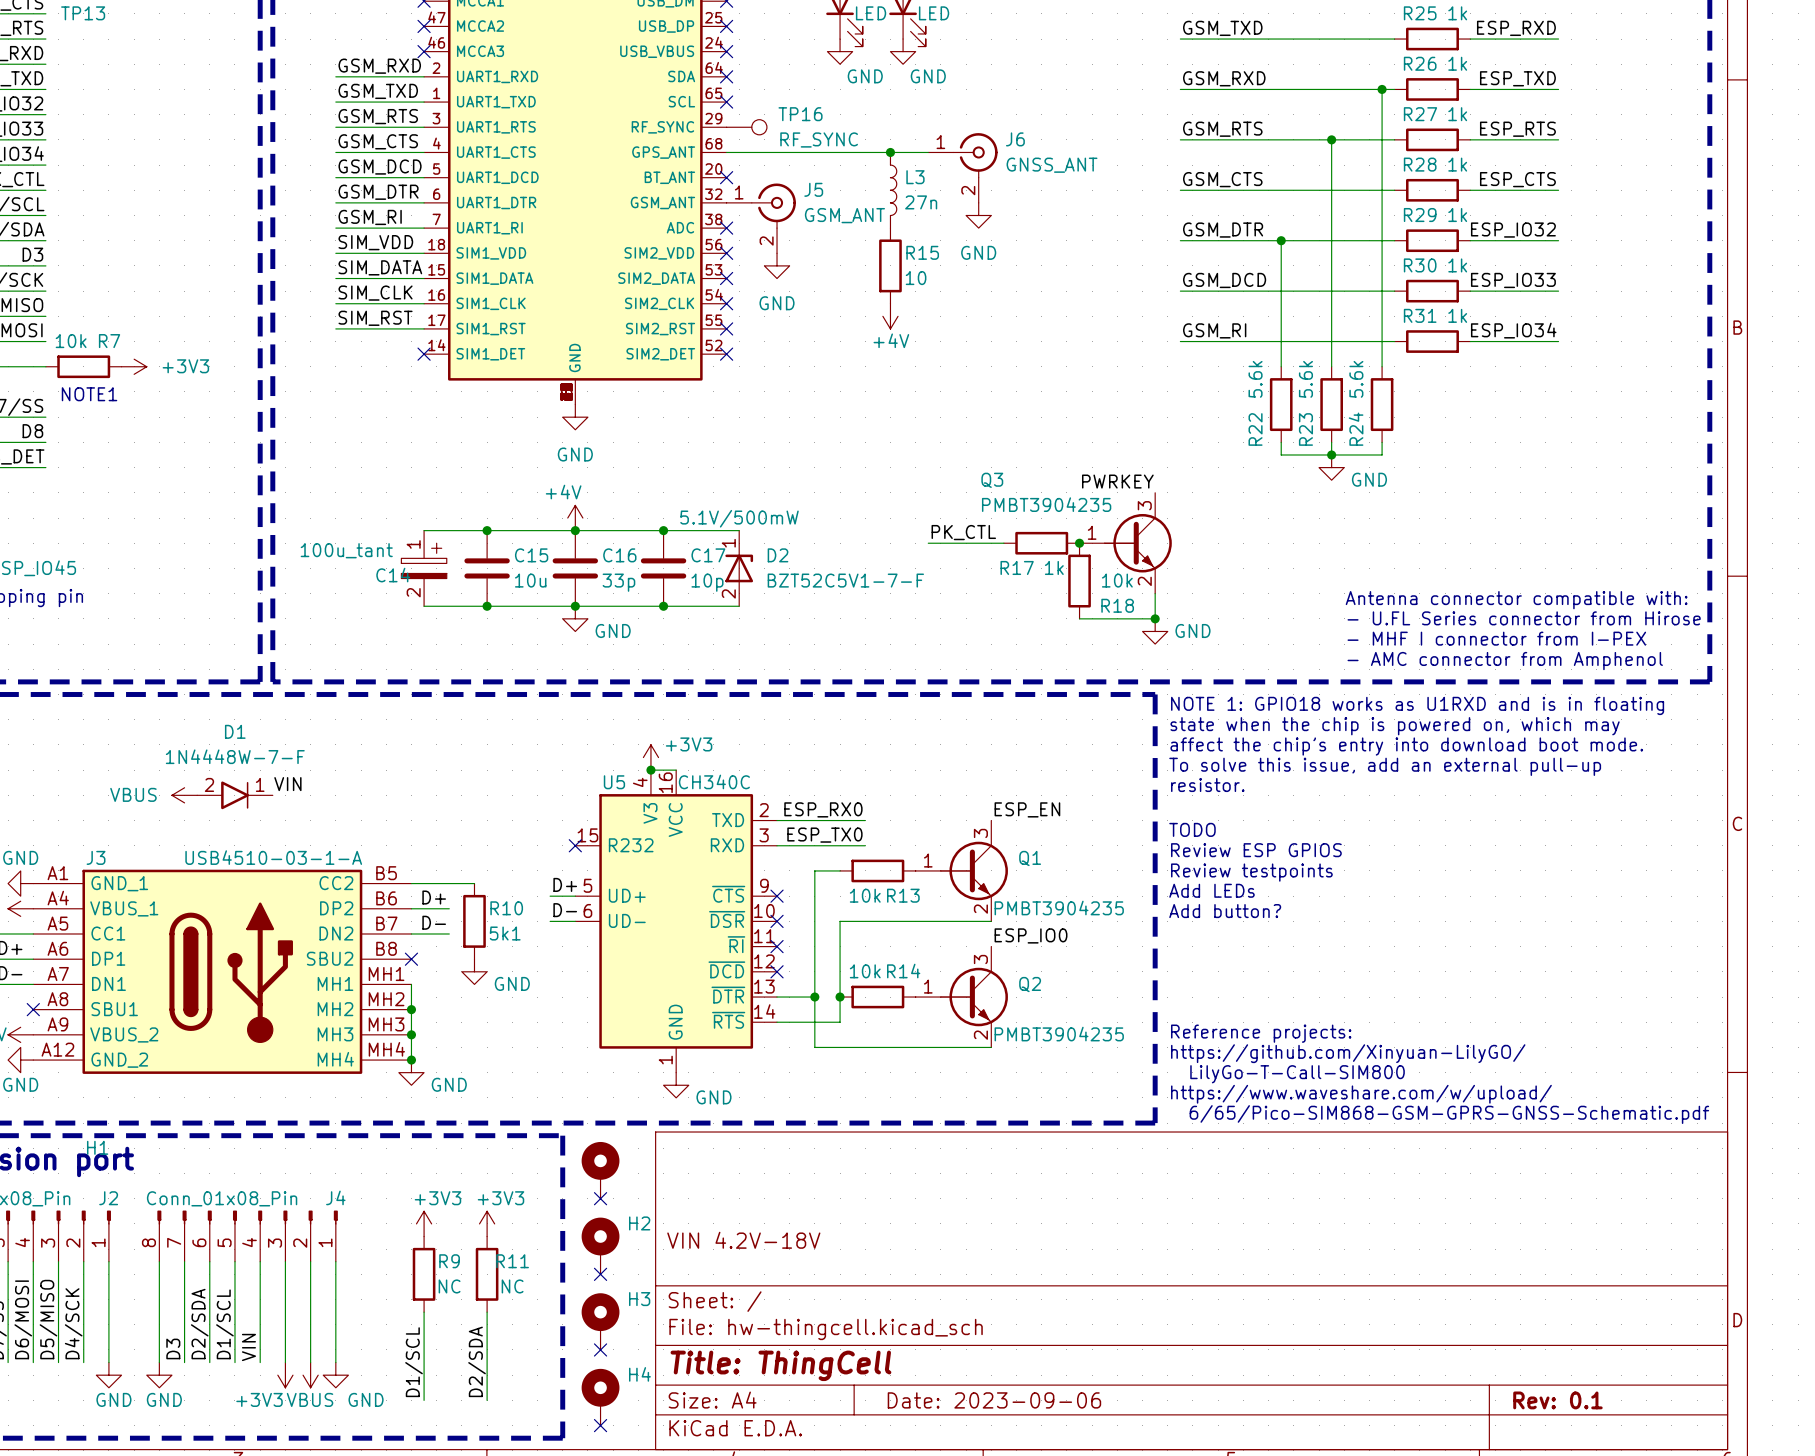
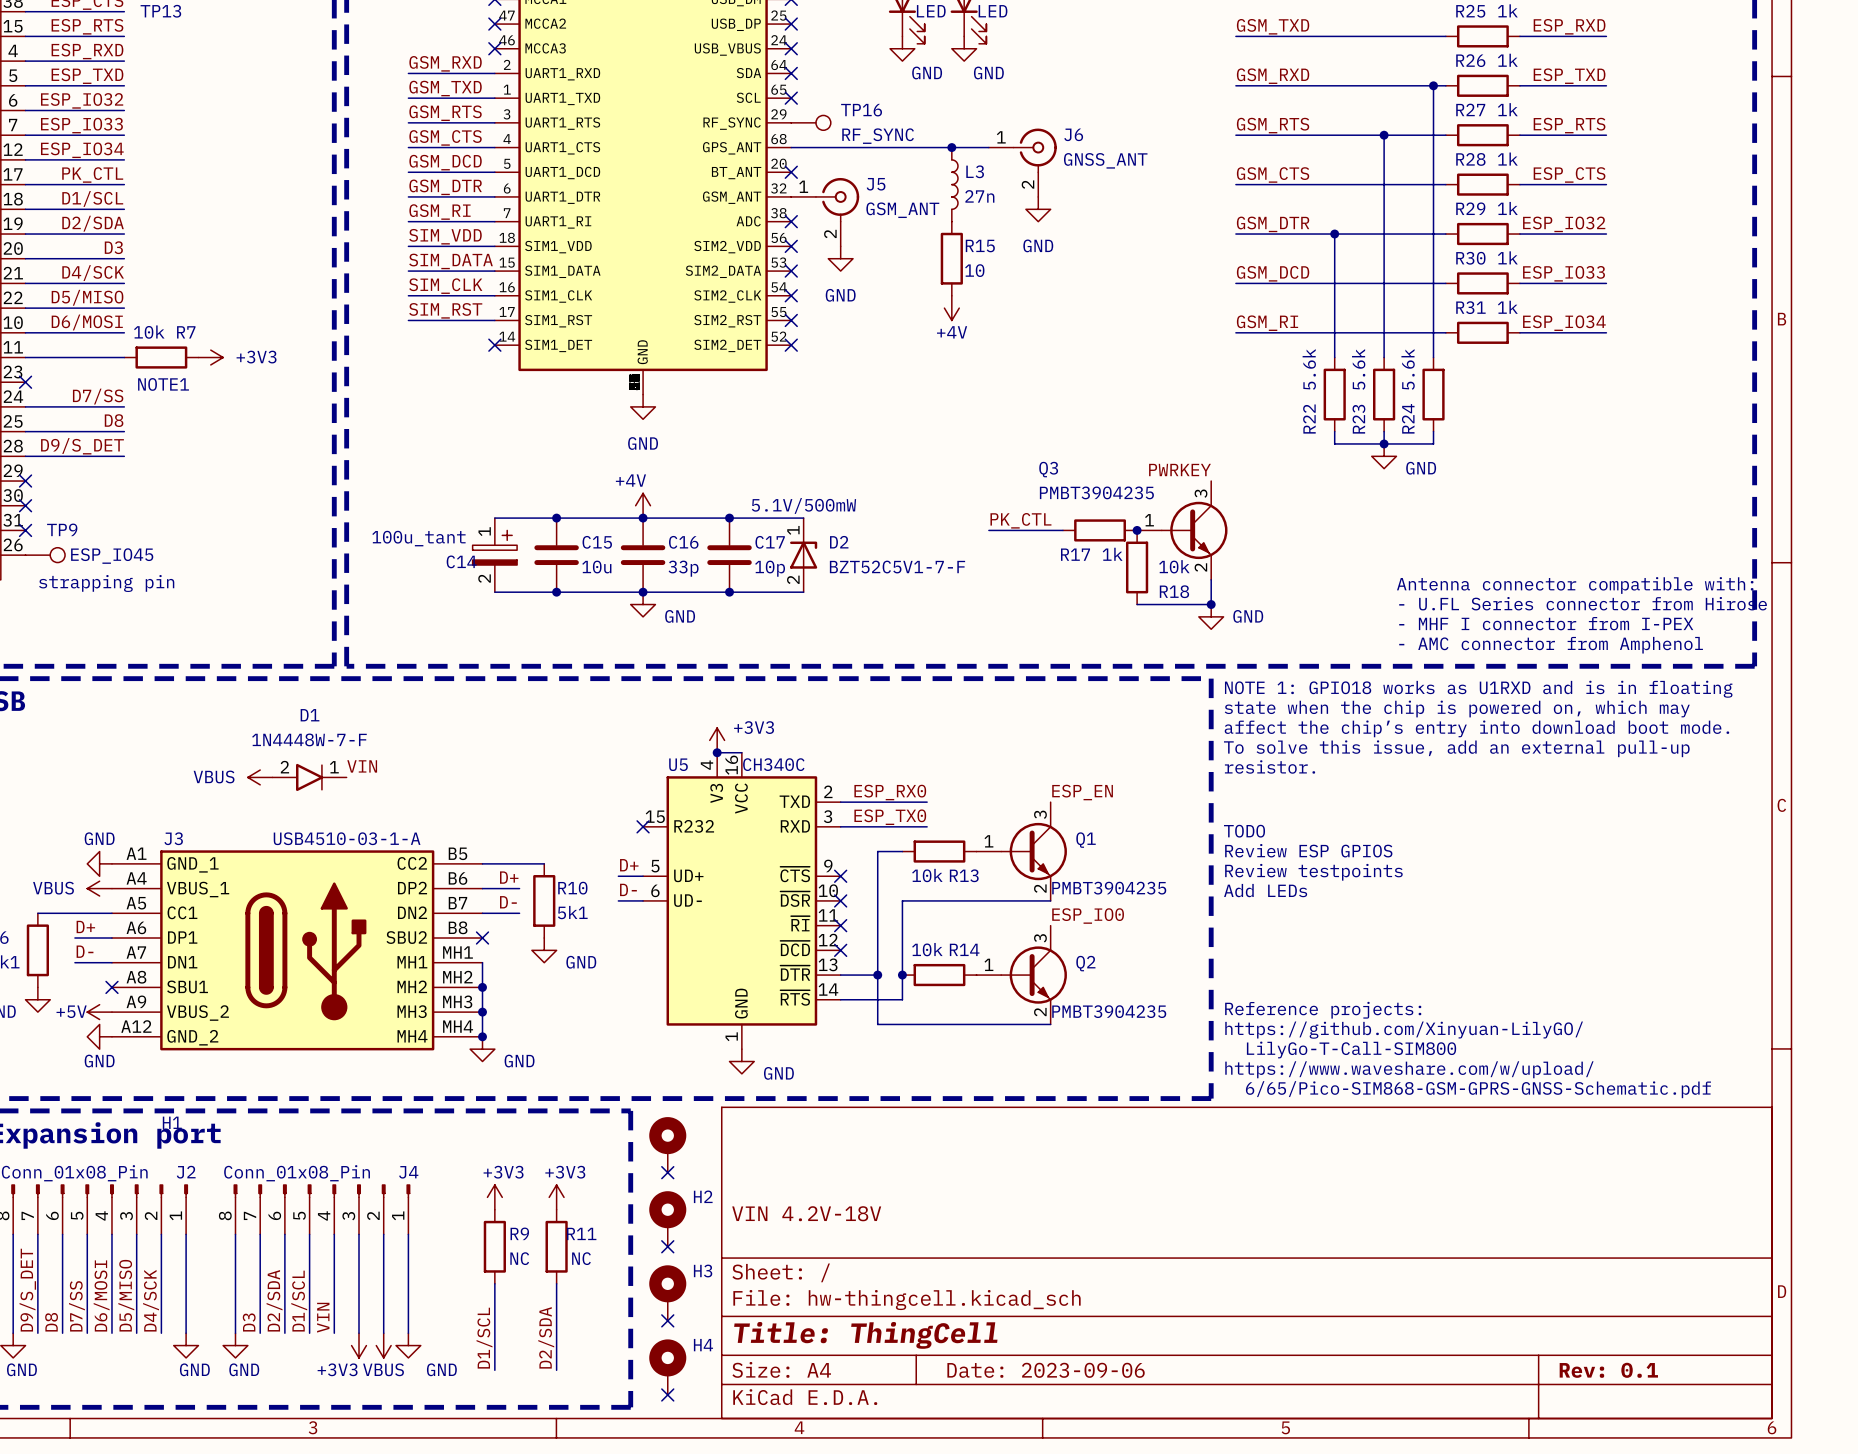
text: TODO (1192, 829) -> none
text: Review ESP GPIOS (1256, 850) -> TODO (1244, 831)
text: Review testpoints (1251, 872) -> Review ESP GPIOS (1308, 850)
text: Add LEDs (1211, 890) -> Review testpoints (1313, 872)
text: Add button? (1225, 911) -> Add LEDs (1265, 890)

